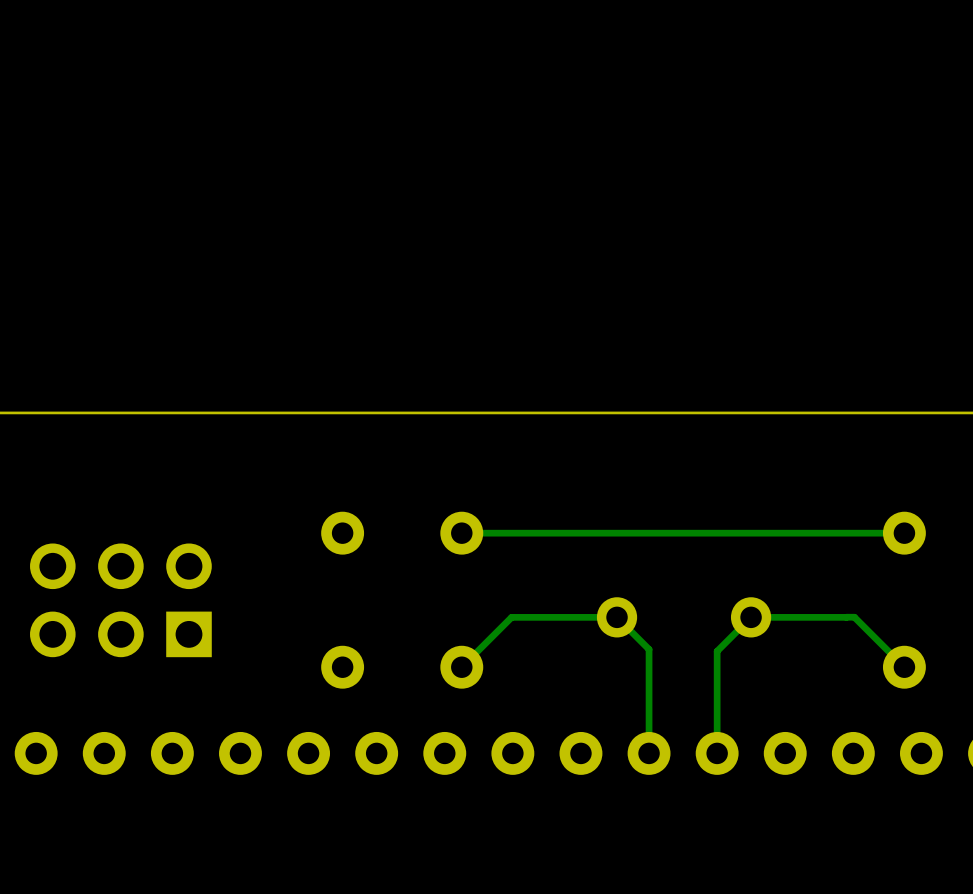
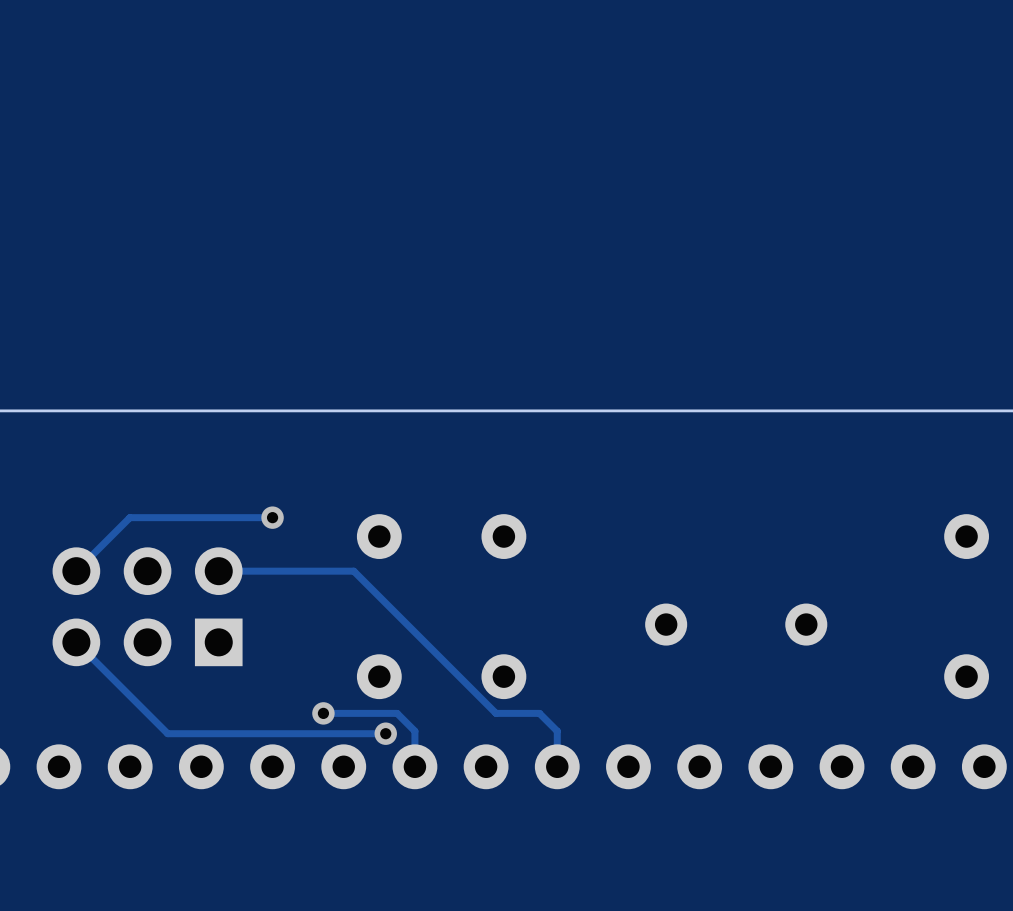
track: none -> (272, 517) (129, 517) (76, 571)
via: none -> (272, 517)
track: (904, 533) (461, 533) -> none
track: none -> (218, 571) (353, 571) (496, 713) (539, 713) (557, 731) (557, 766)
track: none -> (76, 642) (167, 733) (385, 733)
track: (461, 667) (511, 617) (617, 617) (649, 649) (649, 753) -> none
track: (904, 667) (854, 617) (751, 617) (717, 651) (717, 753) -> none
track: none -> (323, 713) (397, 713) (414, 731) (414, 766)
via: none -> (323, 713)
via: none -> (385, 733)

